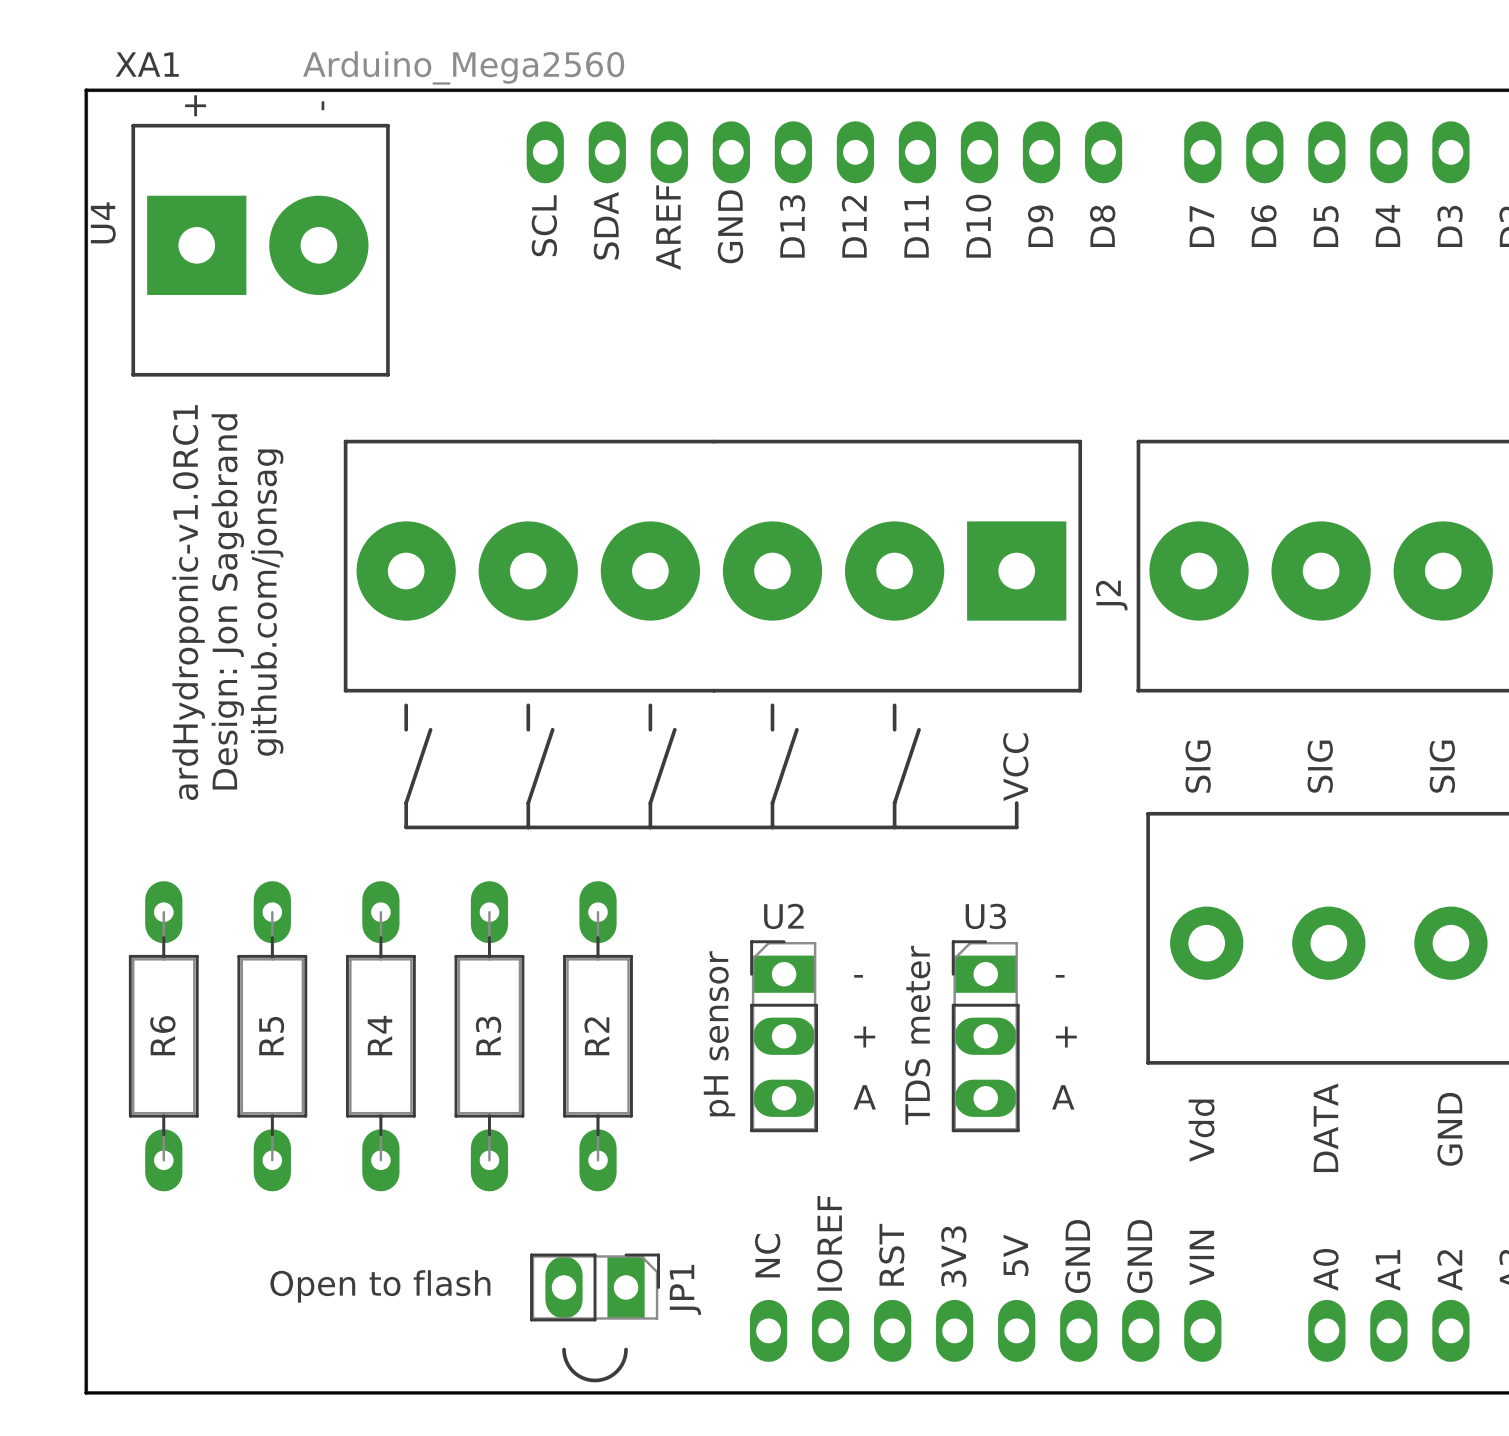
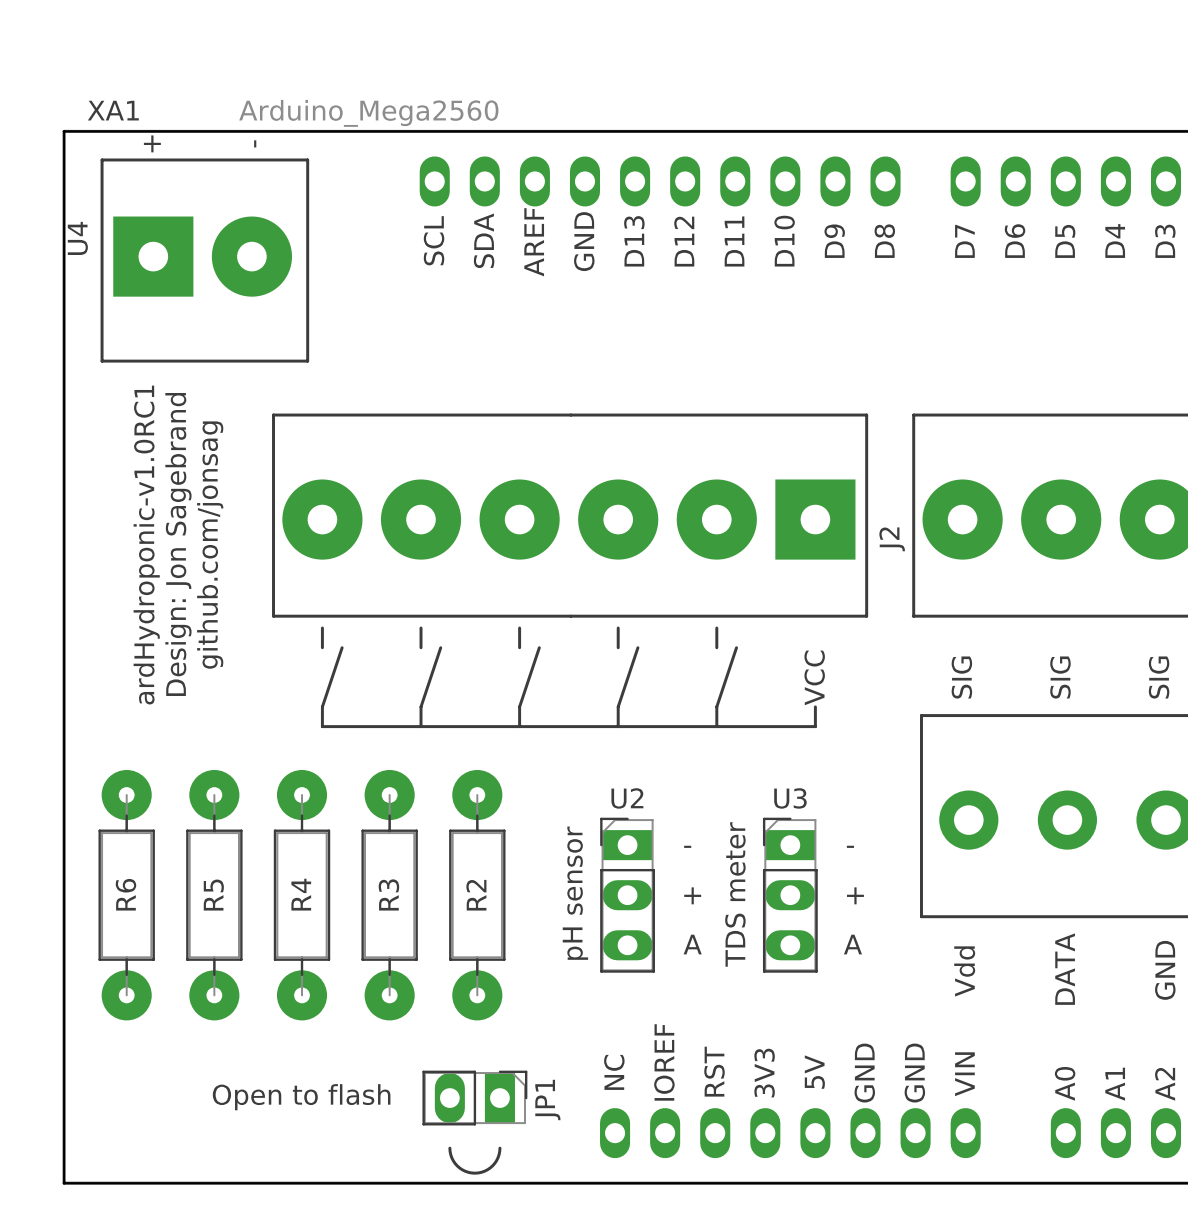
R6 footprint: [128, 881, 199, 1192] -> [98, 769, 155, 1021]
R5 footprint: [237, 881, 308, 1192] -> [186, 769, 243, 1021]
R4 footprint: [345, 881, 416, 1192] -> [273, 769, 331, 1021]
R3 footprint: [454, 881, 525, 1192] -> [361, 769, 418, 1021]
R2 footprint: [563, 881, 633, 1192] -> [449, 769, 506, 1021]

